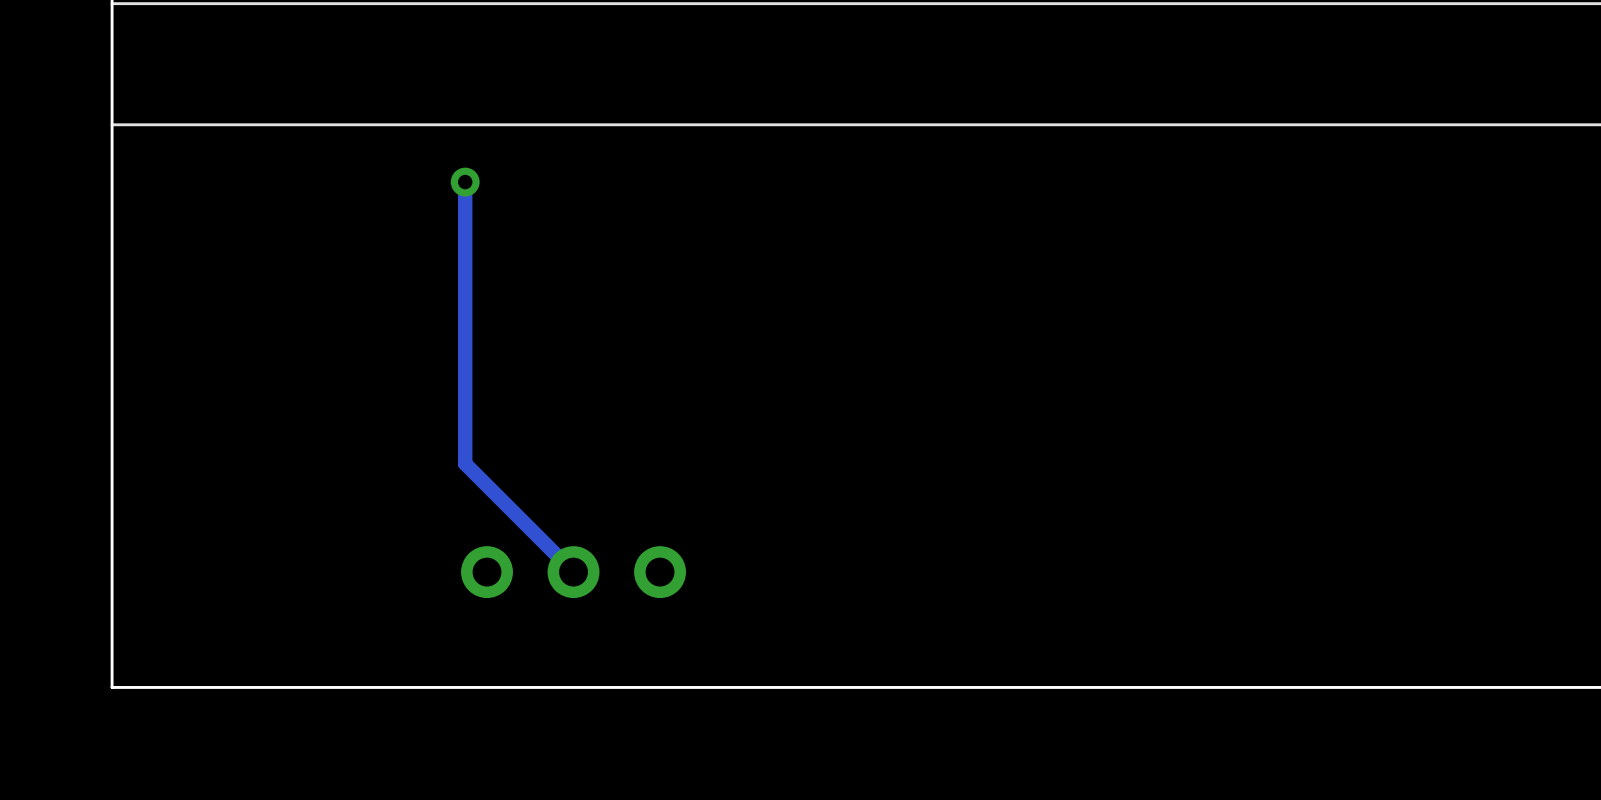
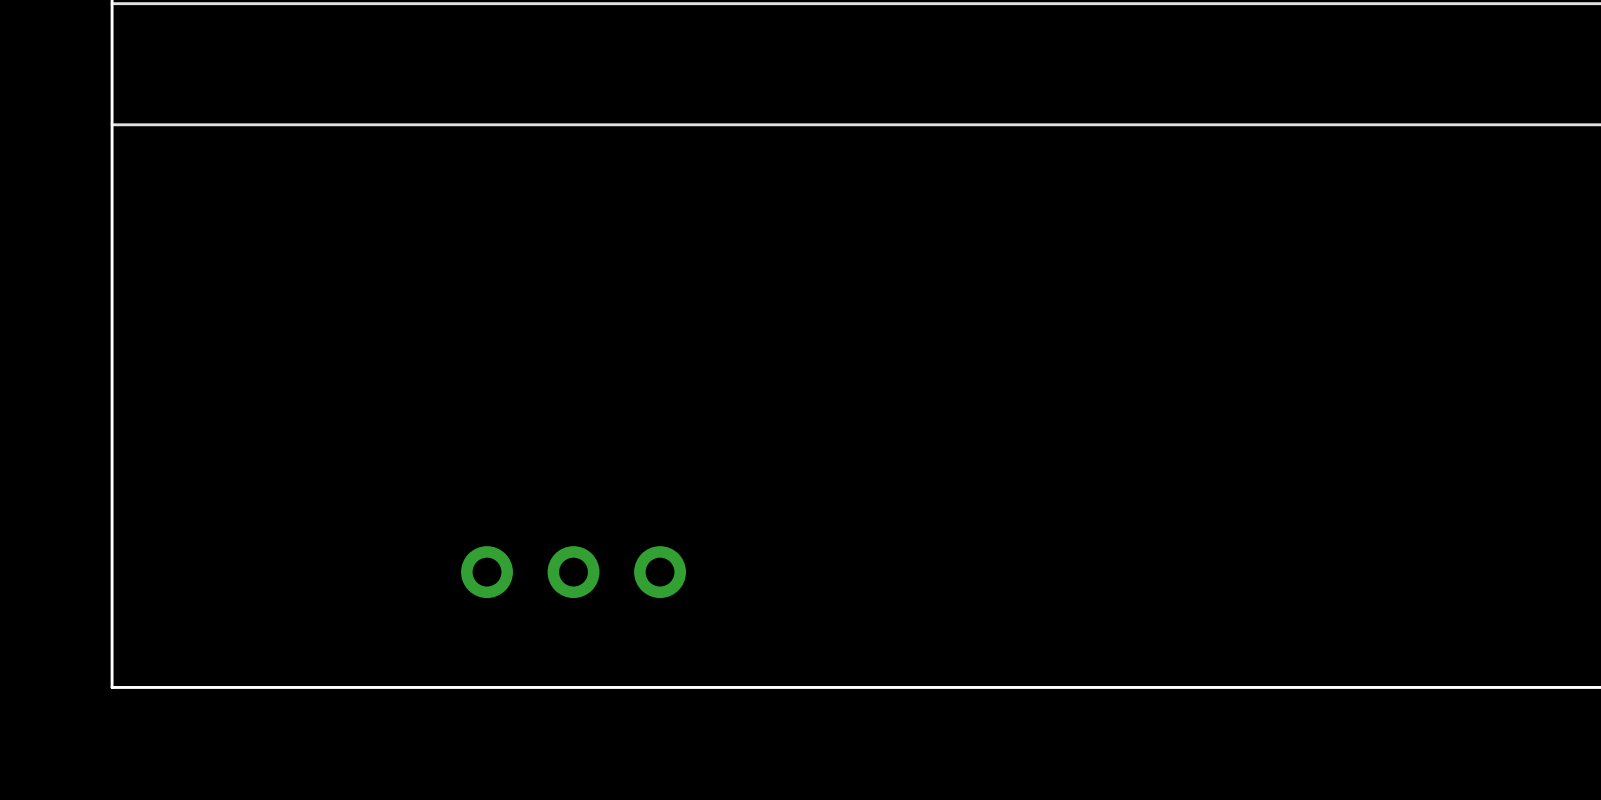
track: (465, 182) (465, 463) (573, 572) -> none
via: (465, 182) -> none

